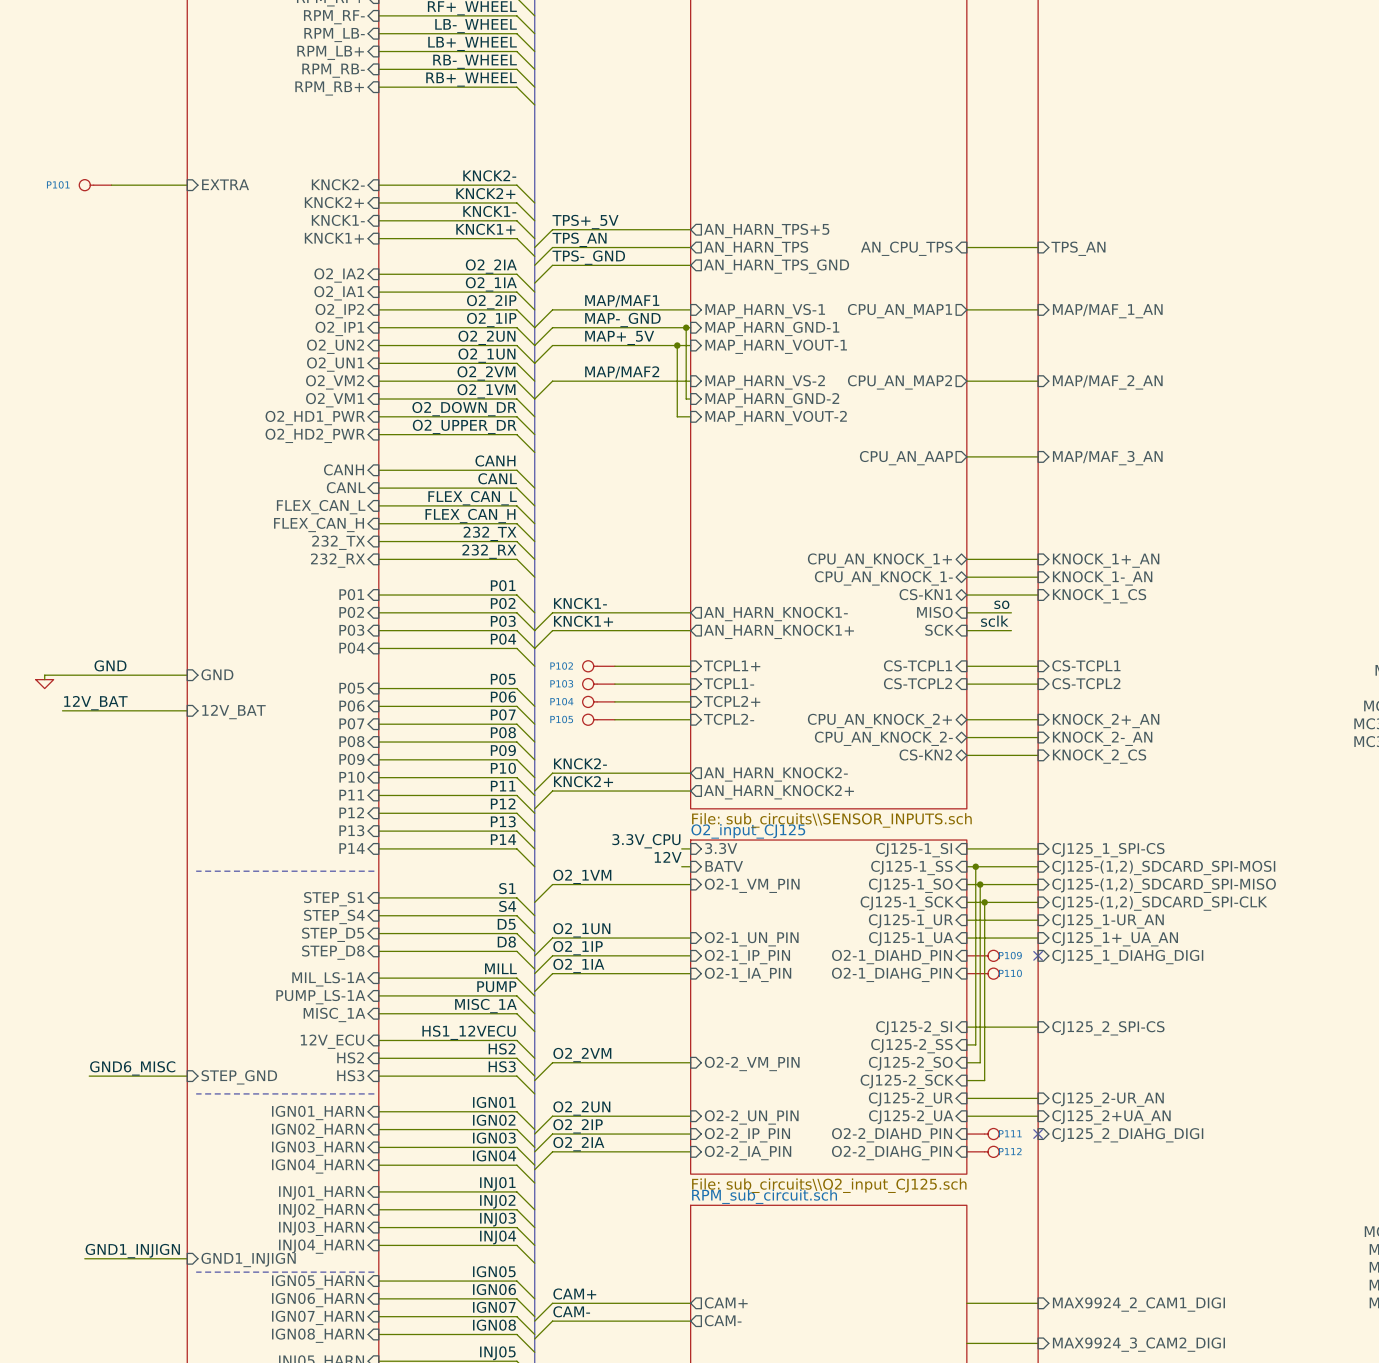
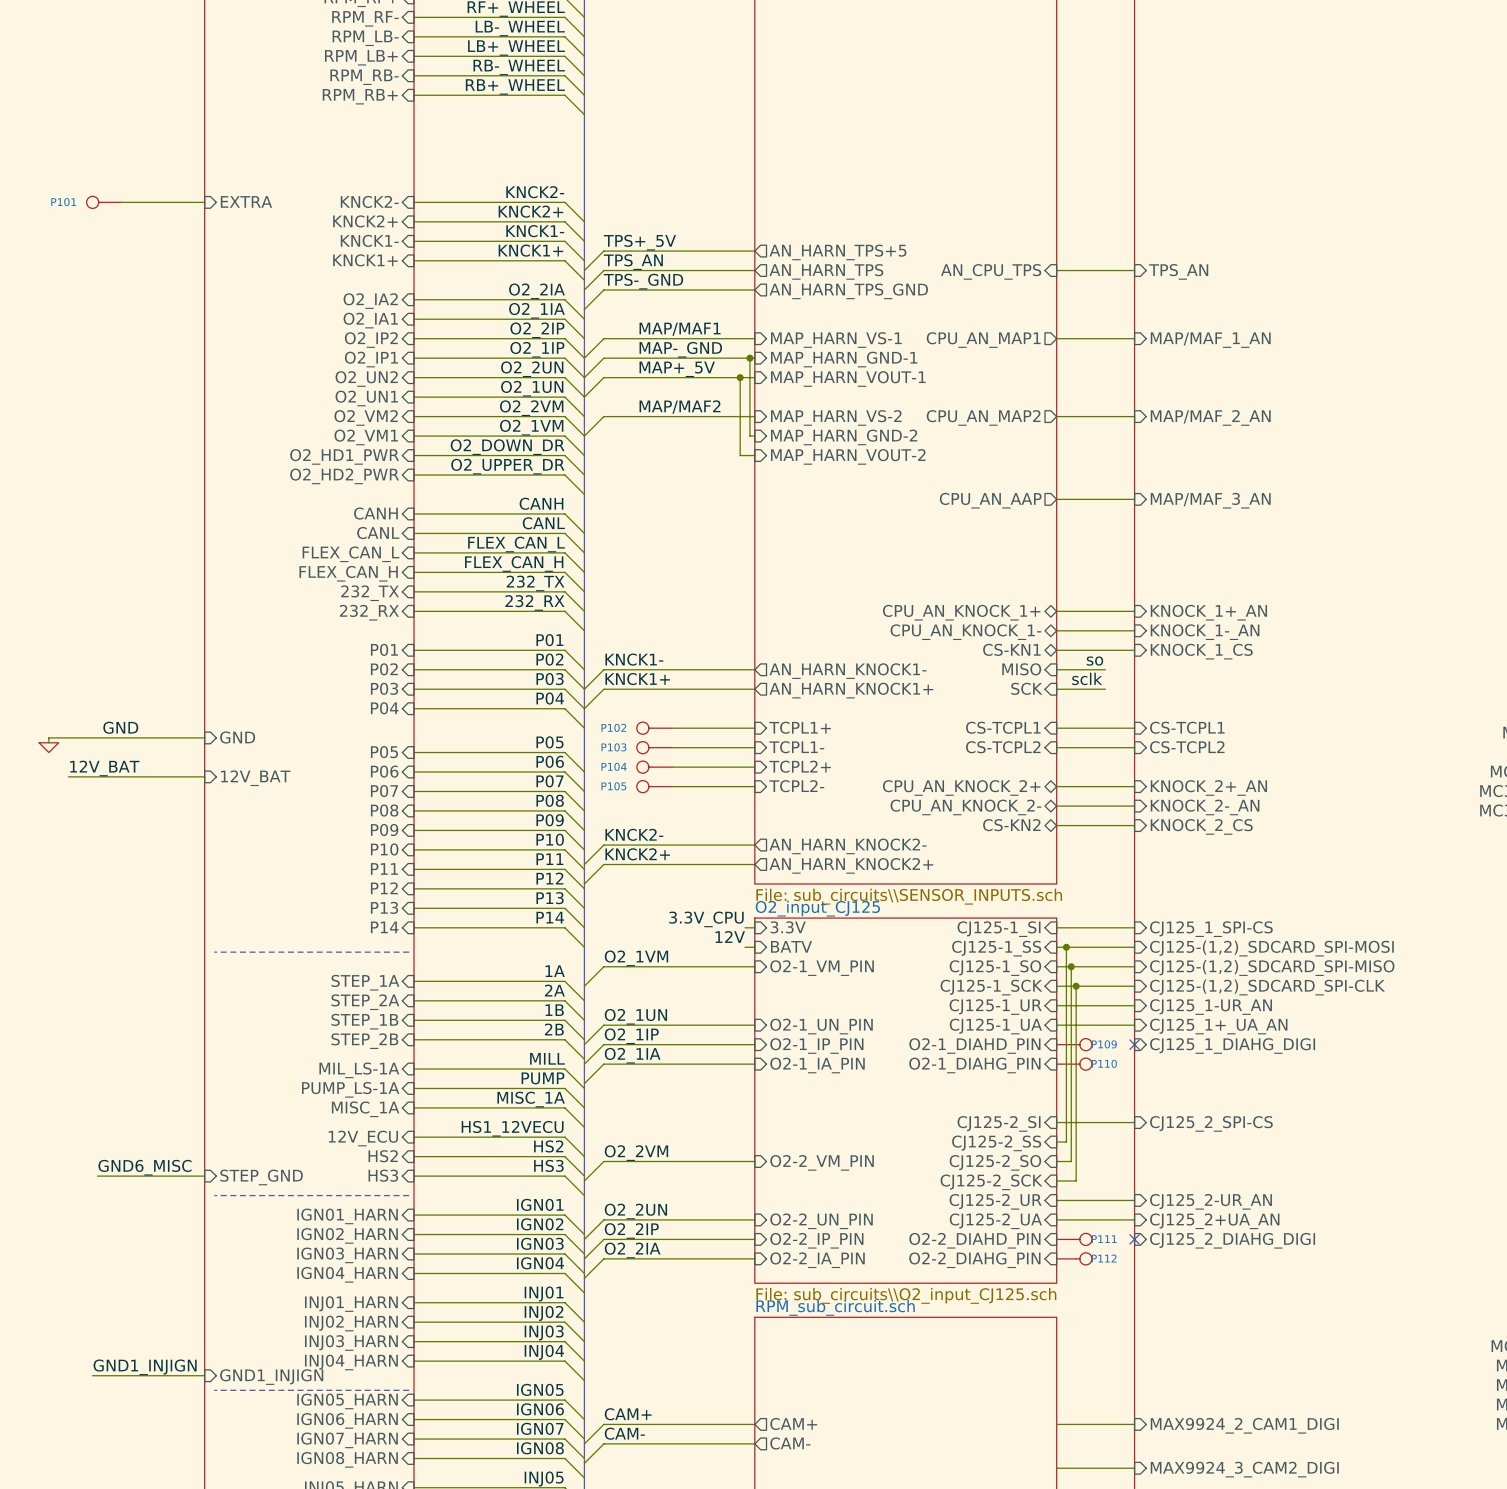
label: S1 (507, 888) -> 1A (555, 971)
sheet pin: STEP_S1 (334, 899) -> STEP_1A (365, 982)
label: S4 (507, 906) -> 2A (554, 990)
sheet pin: STEP_S4 (334, 916) -> STEP_2A (365, 1002)
label: D5 (506, 924) -> 1B (554, 1010)
sheet pin: STEP_D5 (333, 934) -> STEP_1B (364, 1021)
label: D8 (506, 942) -> 2B (554, 1029)
sheet pin: STEP_D8 (333, 952) -> STEP_2B (364, 1041)

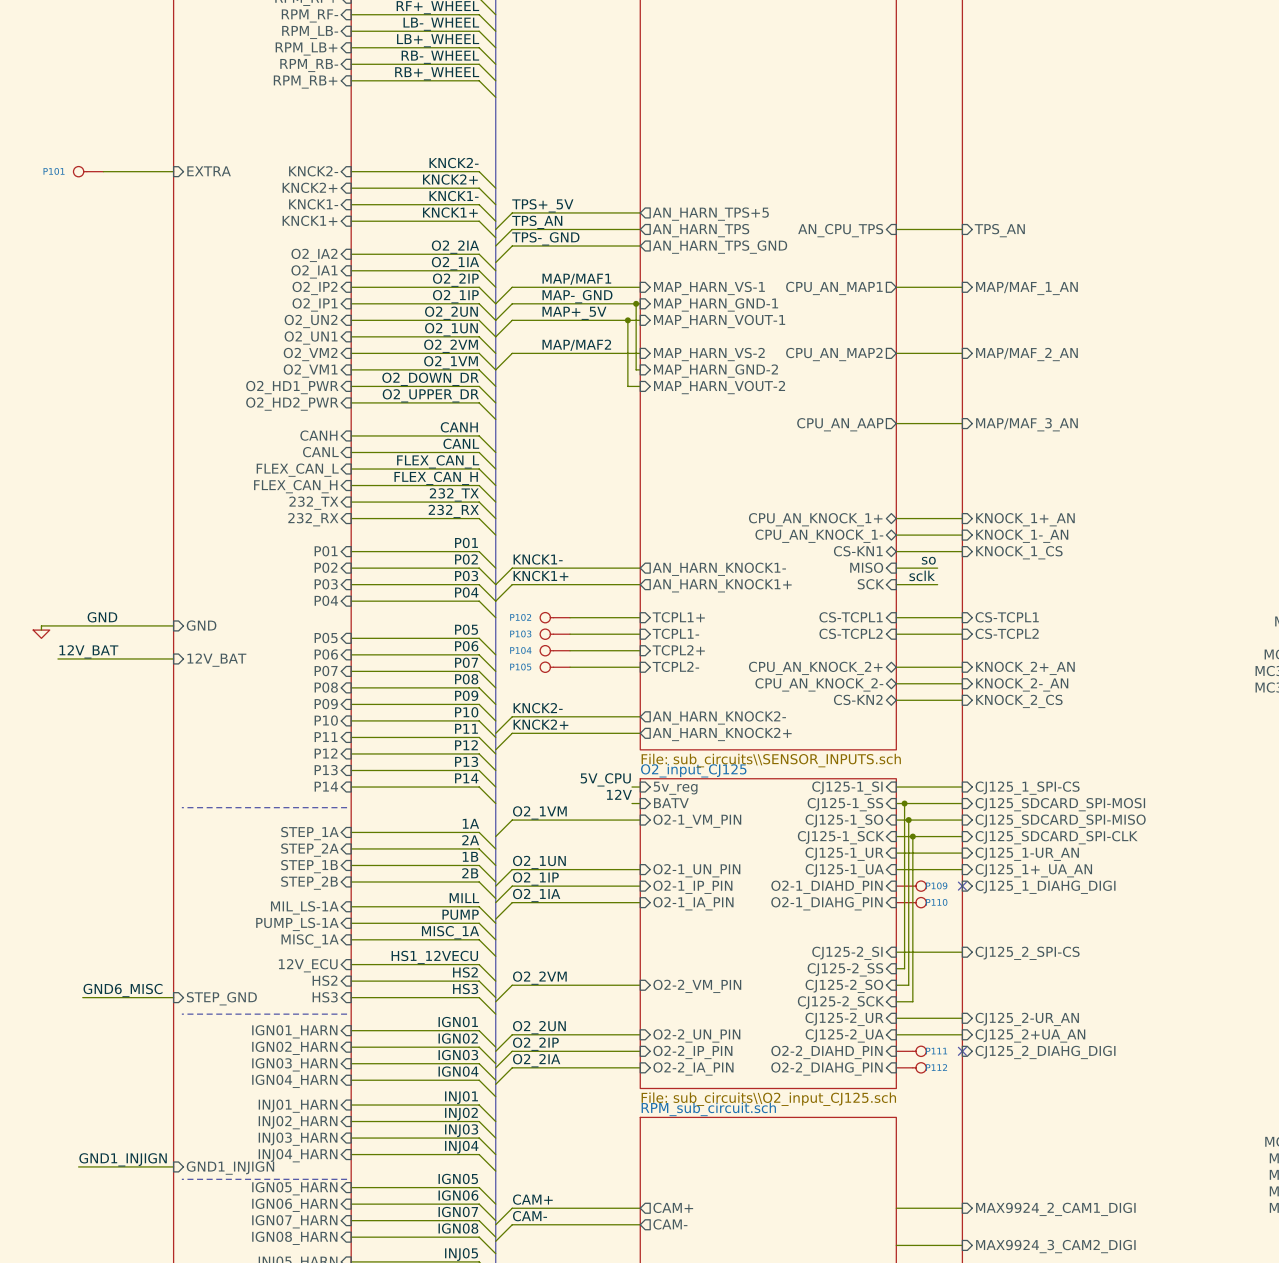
label: 3.3V_CPU (706, 919) -> 5V_CPU (605, 779)
sheet pin: 3.3V (788, 927) -> 5v_reg (675, 788)
sheet pin: CJ125-(1,2)_SDCARD_SPI-MOSI (1271, 948) -> CJ125_SDCARD_SPI-MOSI (1060, 804)
sheet pin: CJ125-(1,2)_SDCARD_SPI-MISO (1272, 967) -> CJ125_SDCARD_SPI-MISO (1060, 821)
sheet pin: CJ125-(1,2)_SDCARD_SPI-CLK (1267, 987) -> CJ125_SDCARD_SPI-CLK (1056, 837)

